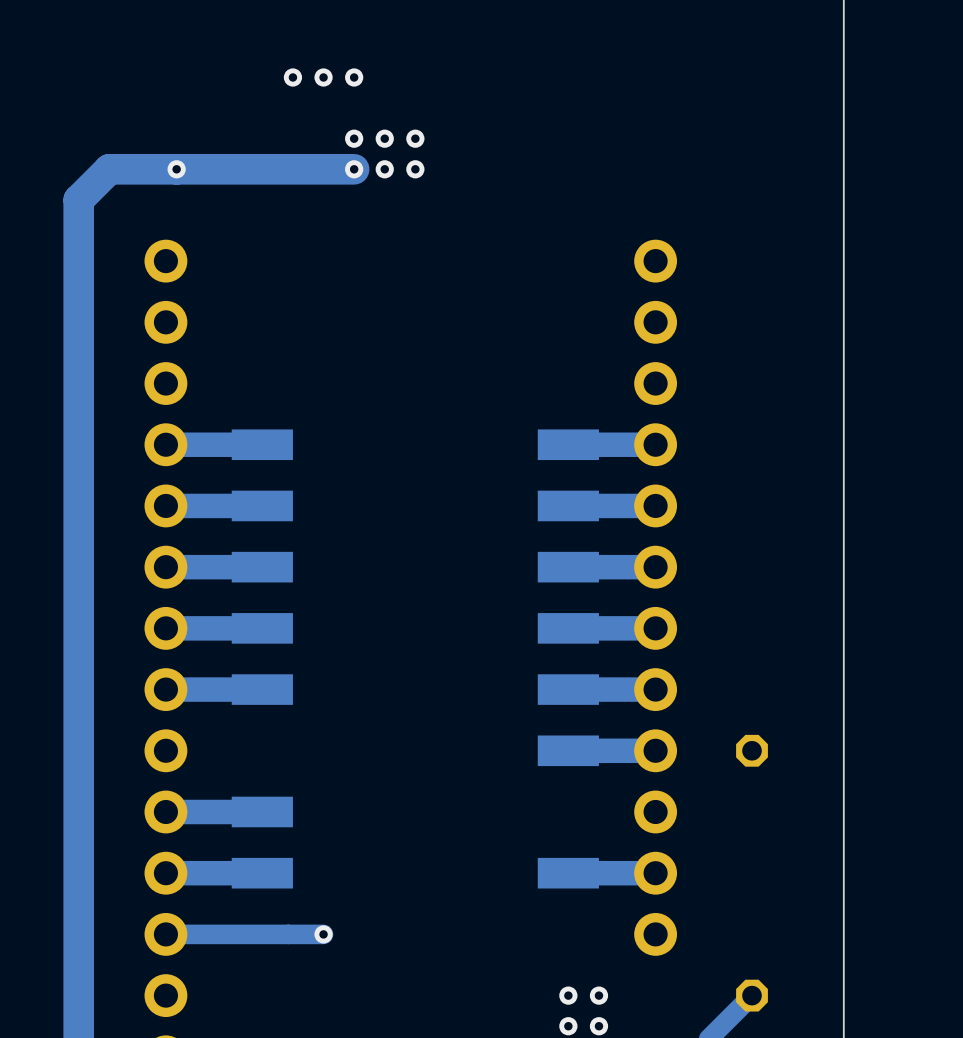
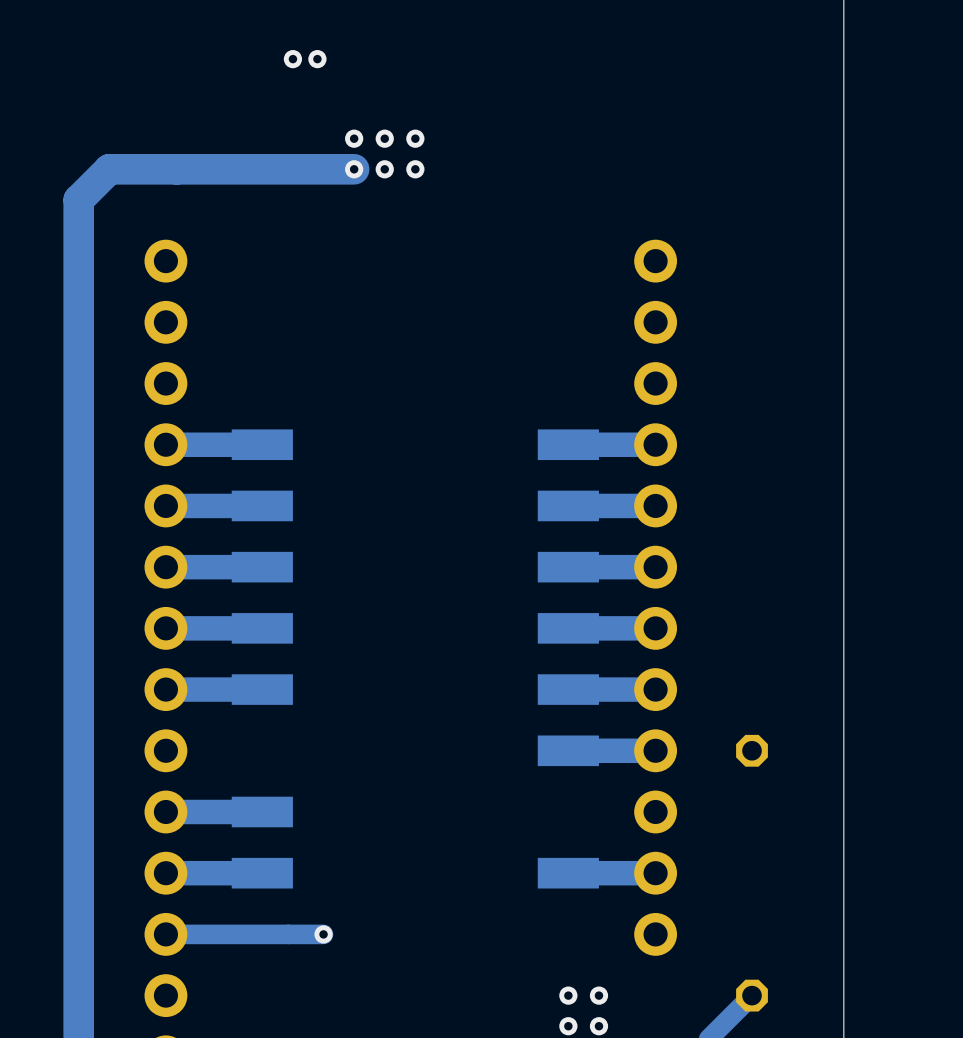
via: none -> (292, 59)
via: none -> (317, 59)
via: (292, 77) -> none
via: (323, 77) -> none
via: (354, 77) -> none
via: (176, 169) -> none

